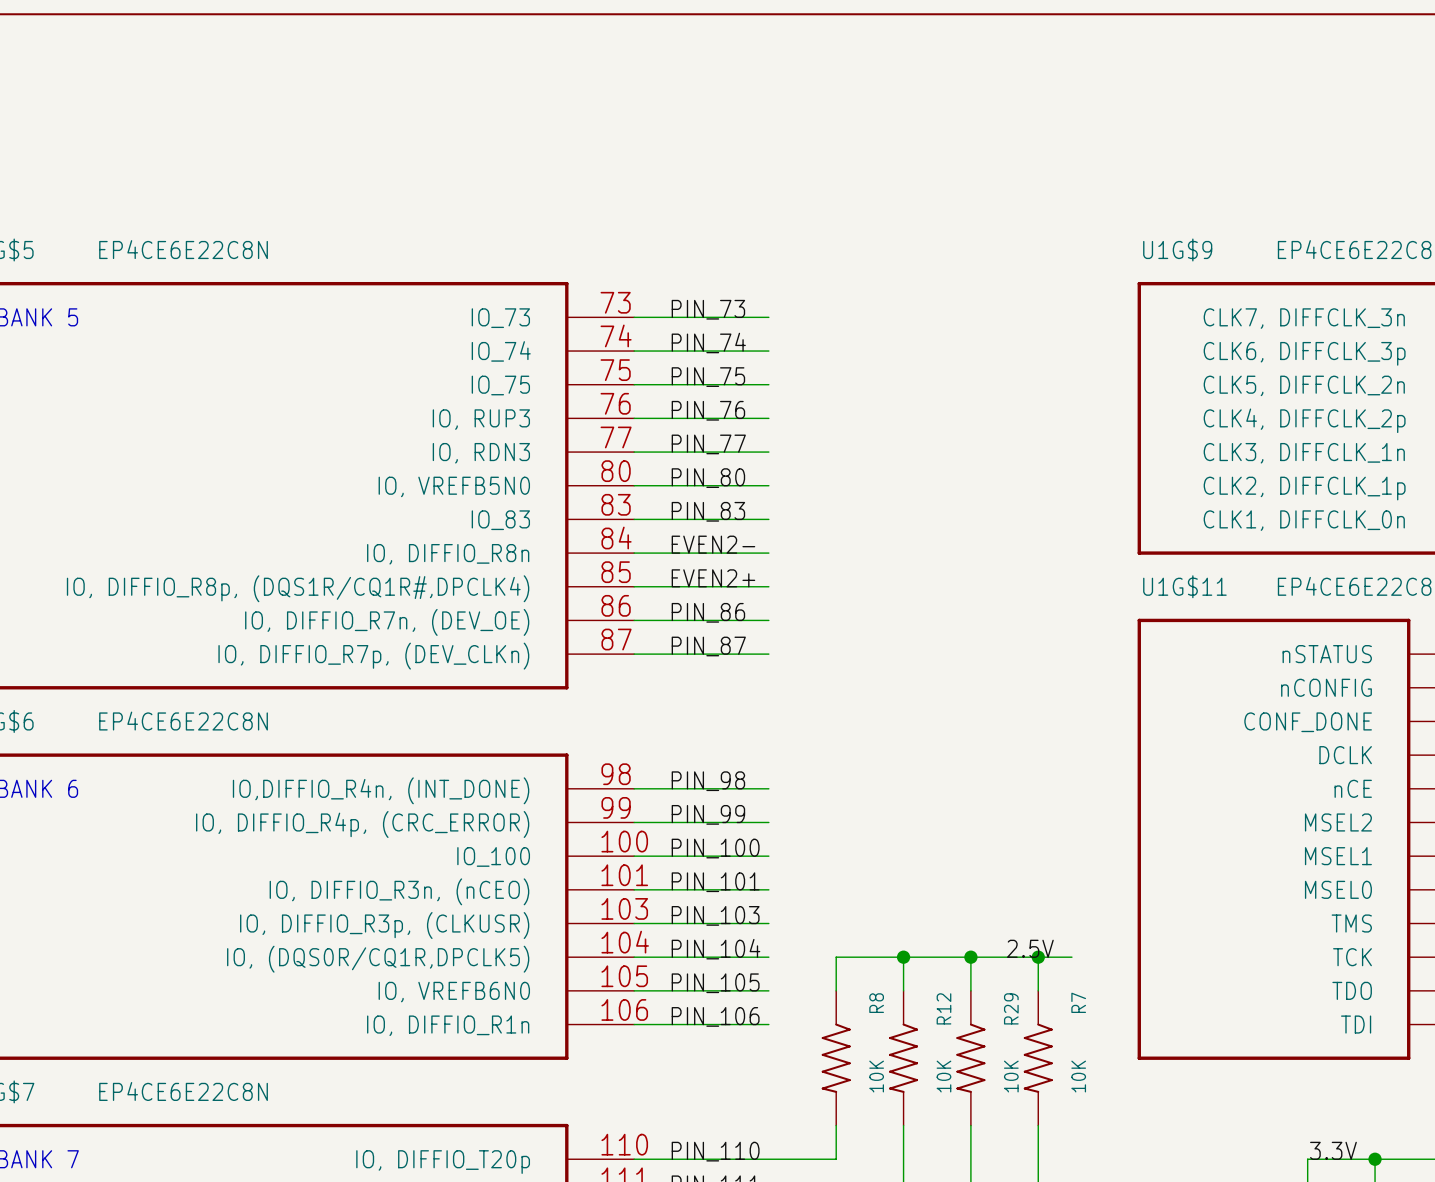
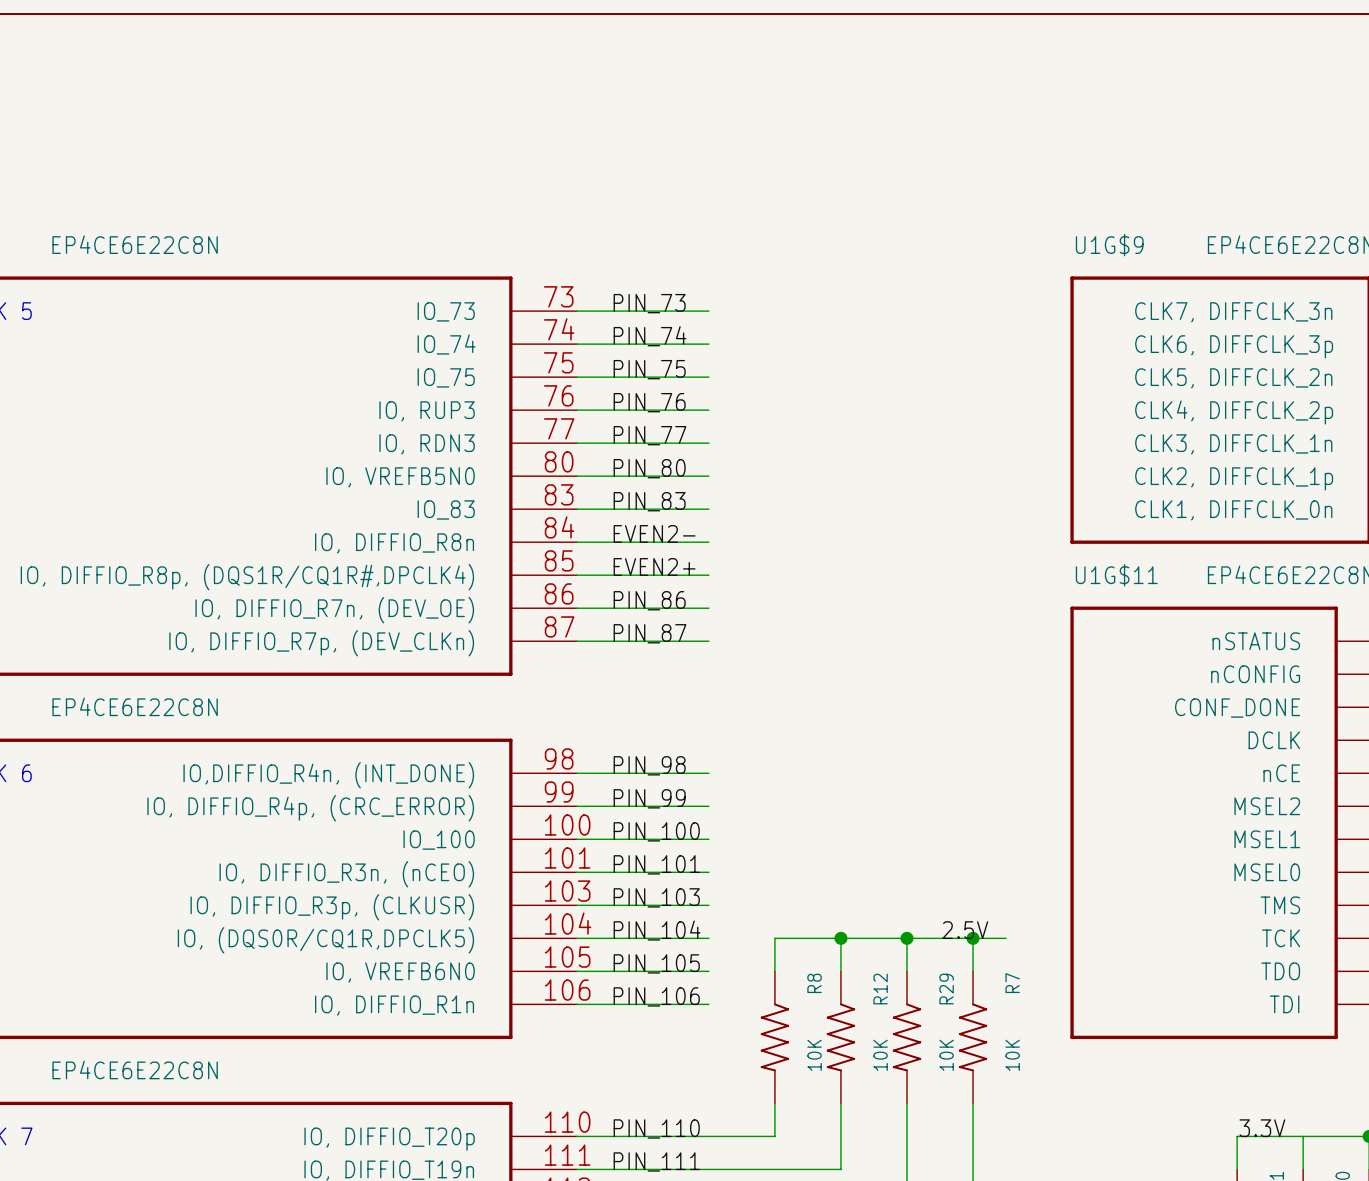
junction: (1375, 1159) -> none

